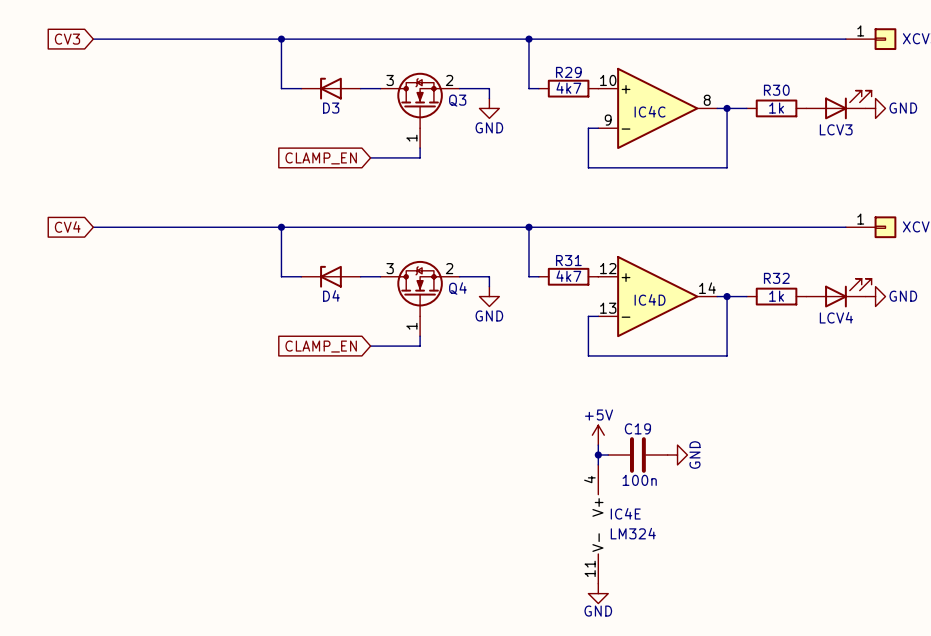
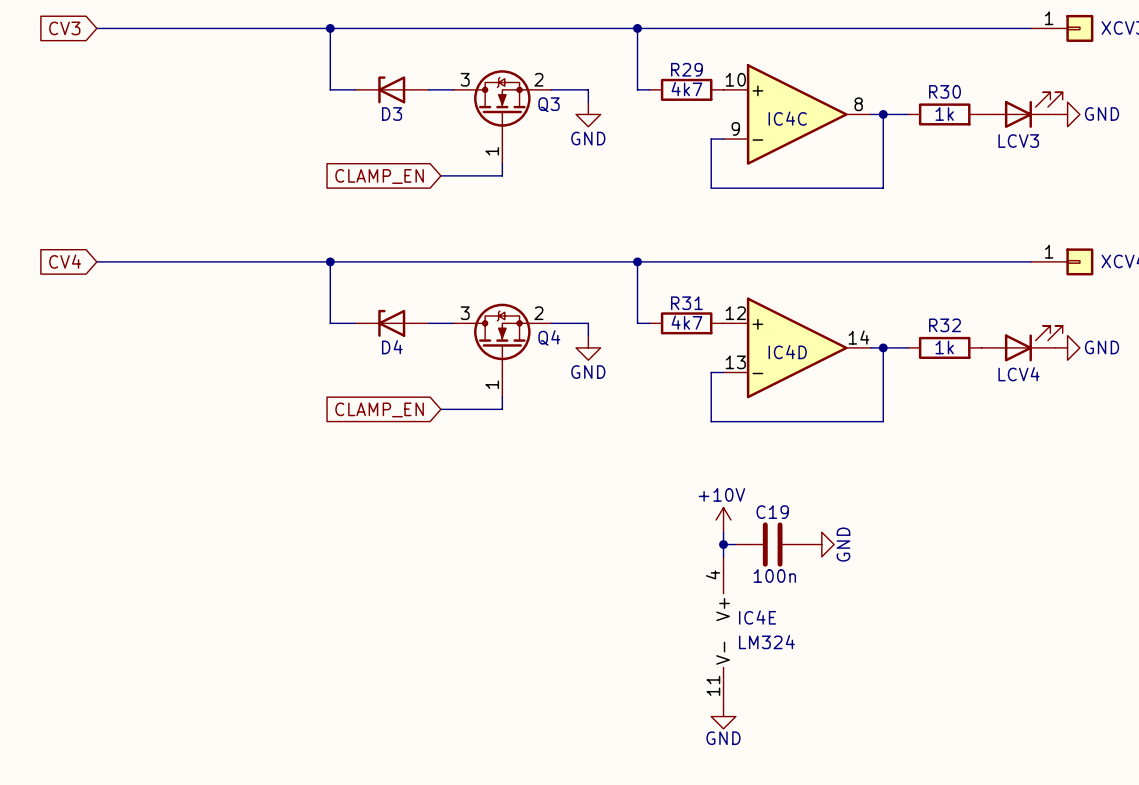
power symbol: +5V (598, 435) -> +10V (723, 519)

